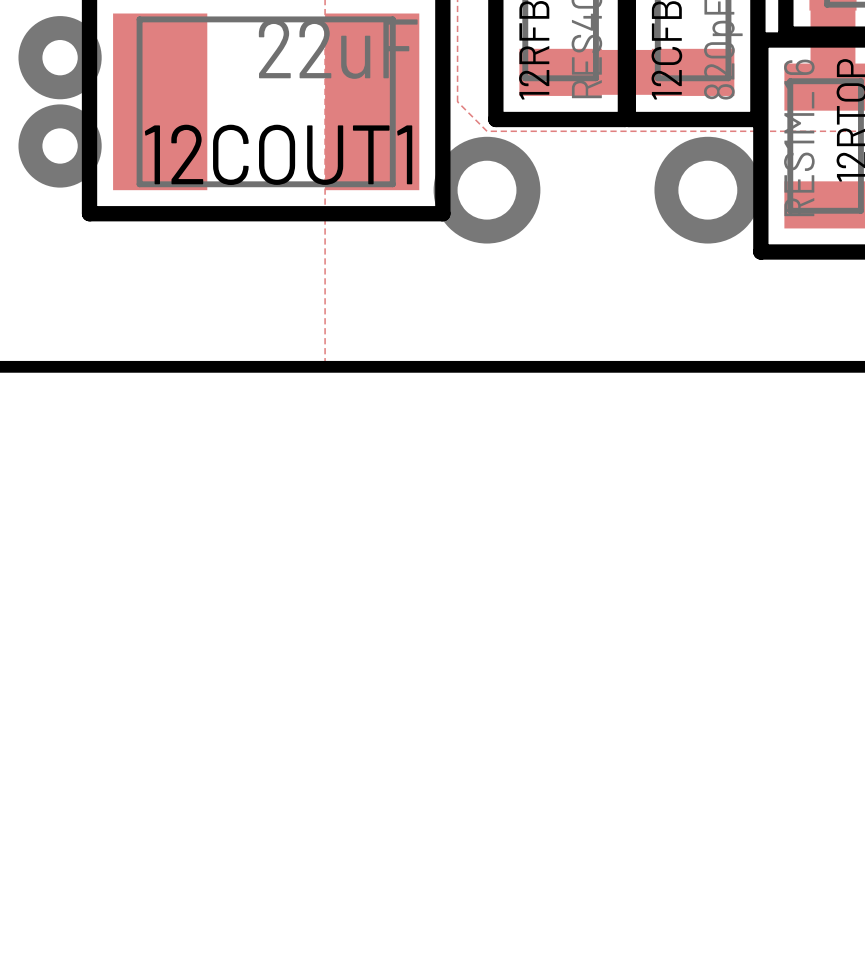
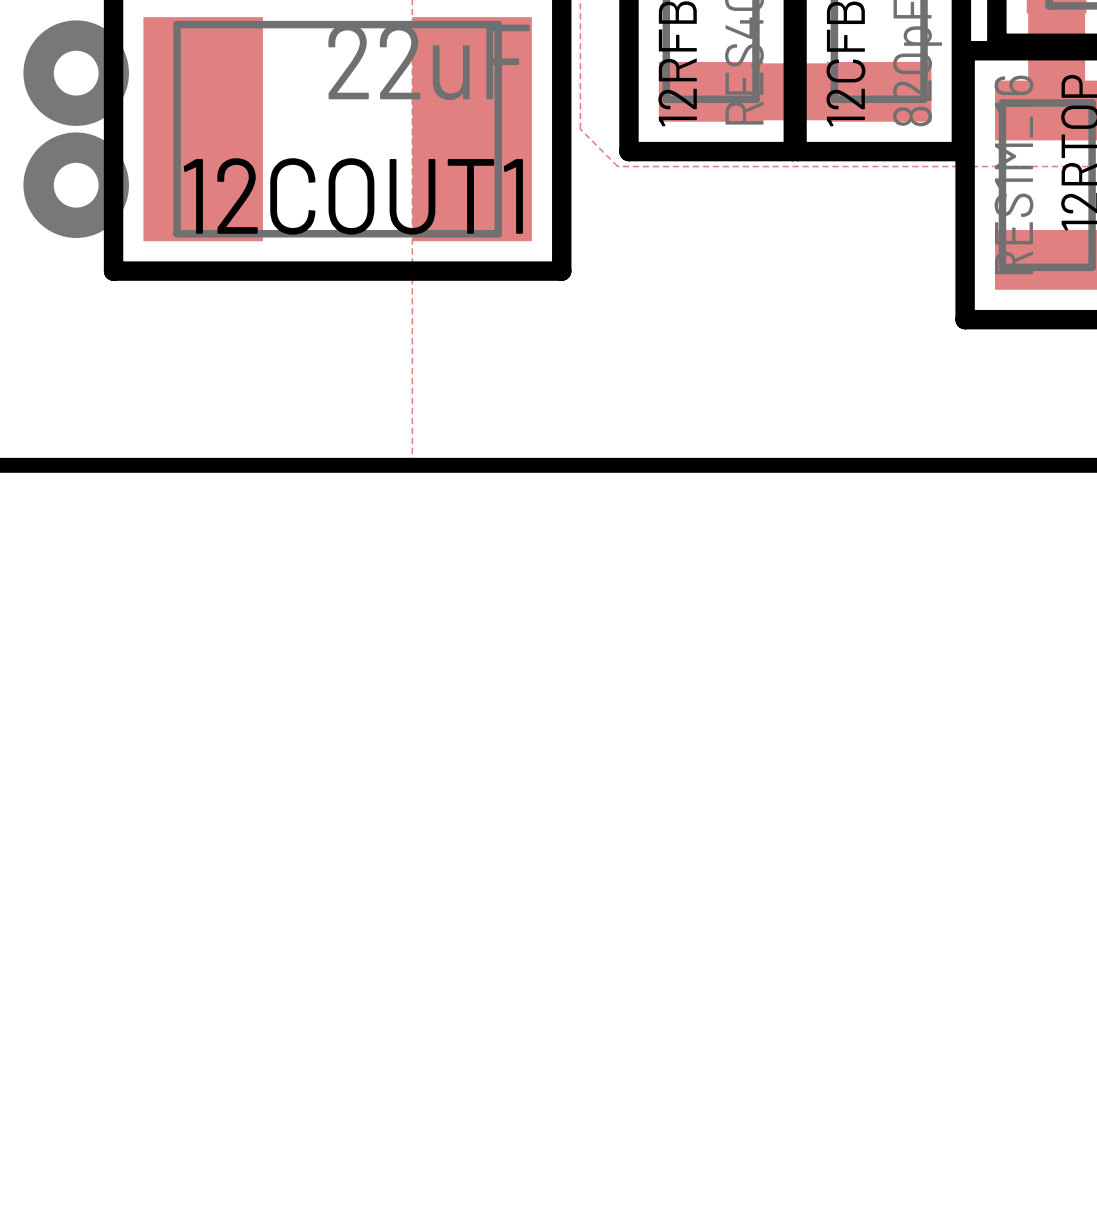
via: (487, 190) -> none
via: (707, 190) -> none

